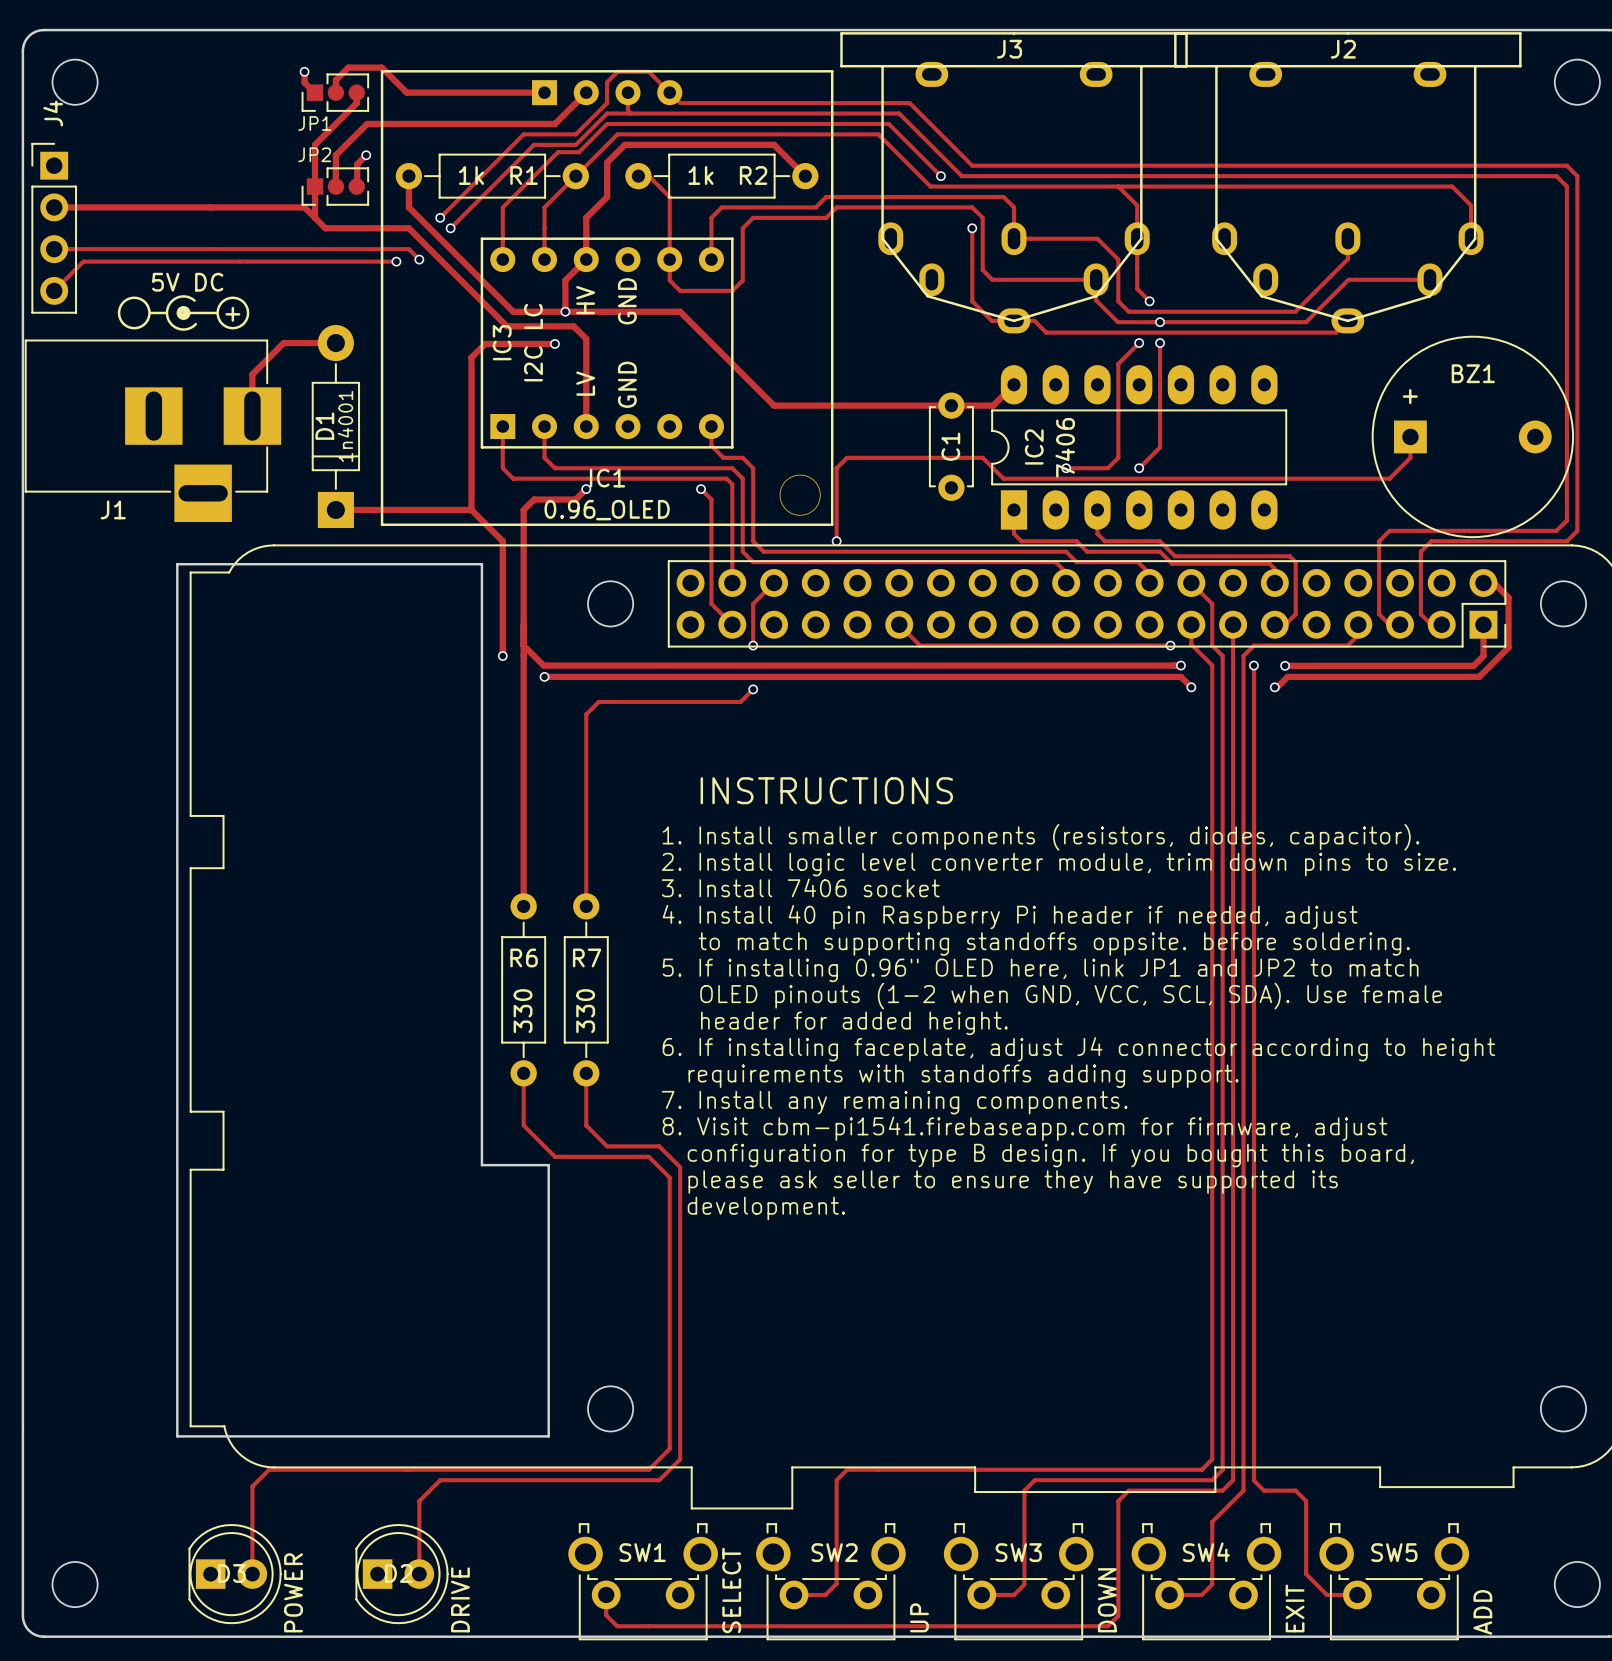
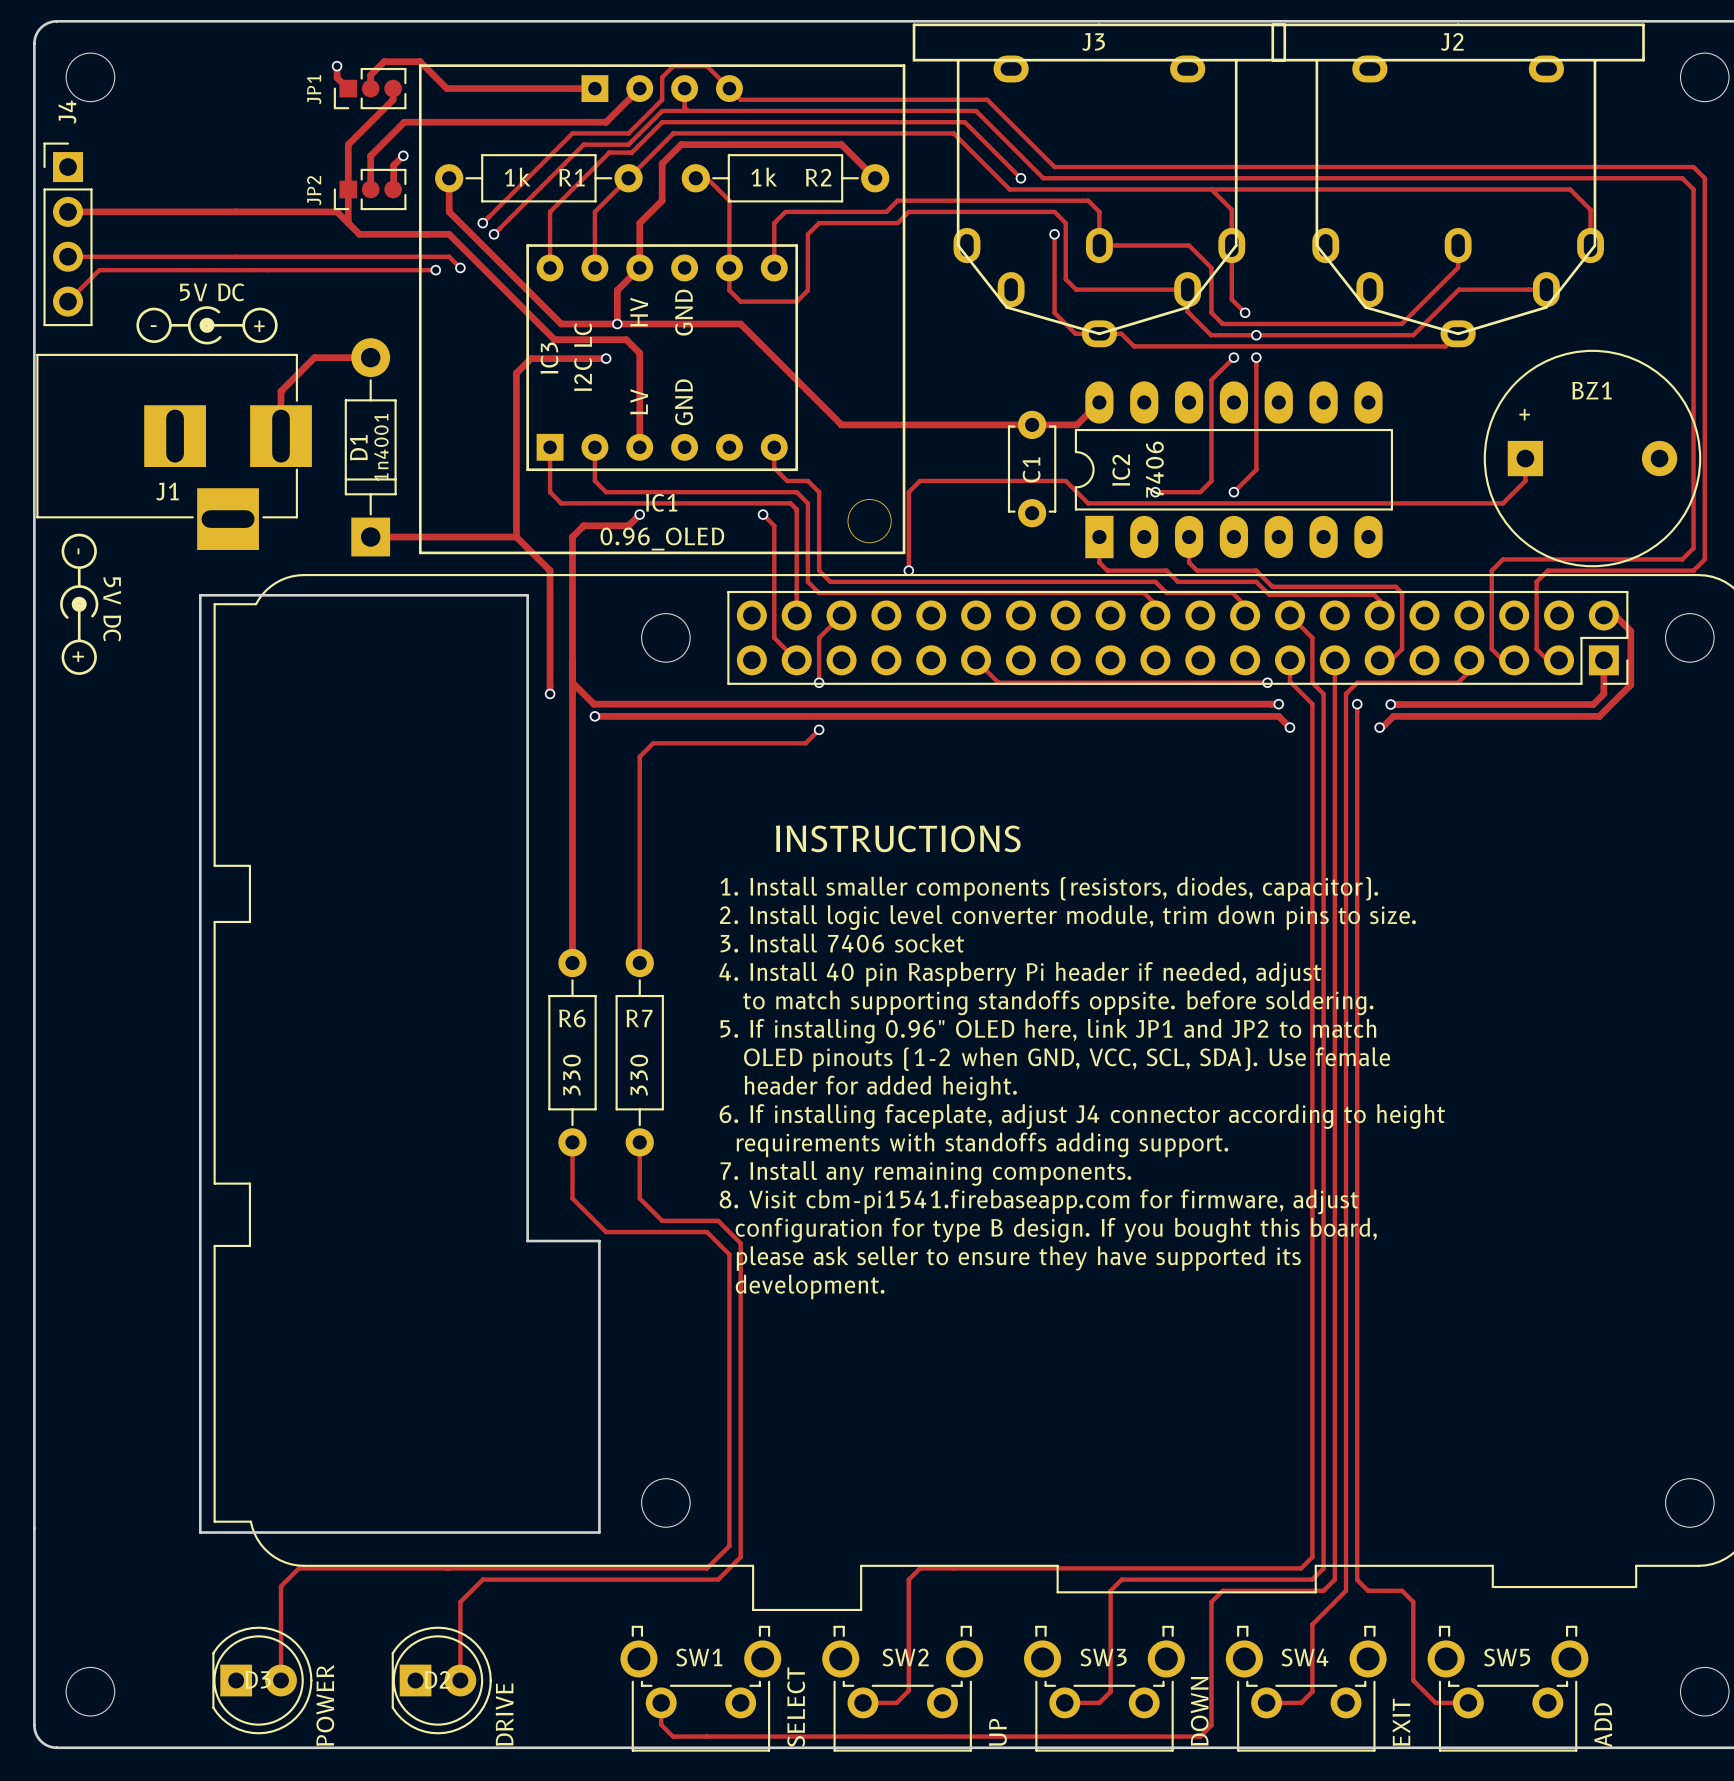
JP1 name rotation: 0° (314, 123) -> 90° counterclockwise (314, 89)
JP1 name position: JP1 (314, 123) -> JP1 (314, 89)
JP2 name rotation: 0° (314, 154) -> 90° counterclockwise (314, 190)
JP2 name position: JP2 (314, 154) -> JP2 (314, 190)
text: none -> - (153, 326)
drawing: none -> [60, 533, 99, 675]
J1 name position: J1 (113, 509) -> J1 (167, 491)
text: none -> - (78, 551)
text: none -> 5V DC (112, 609)
text: none -> + (78, 656)

